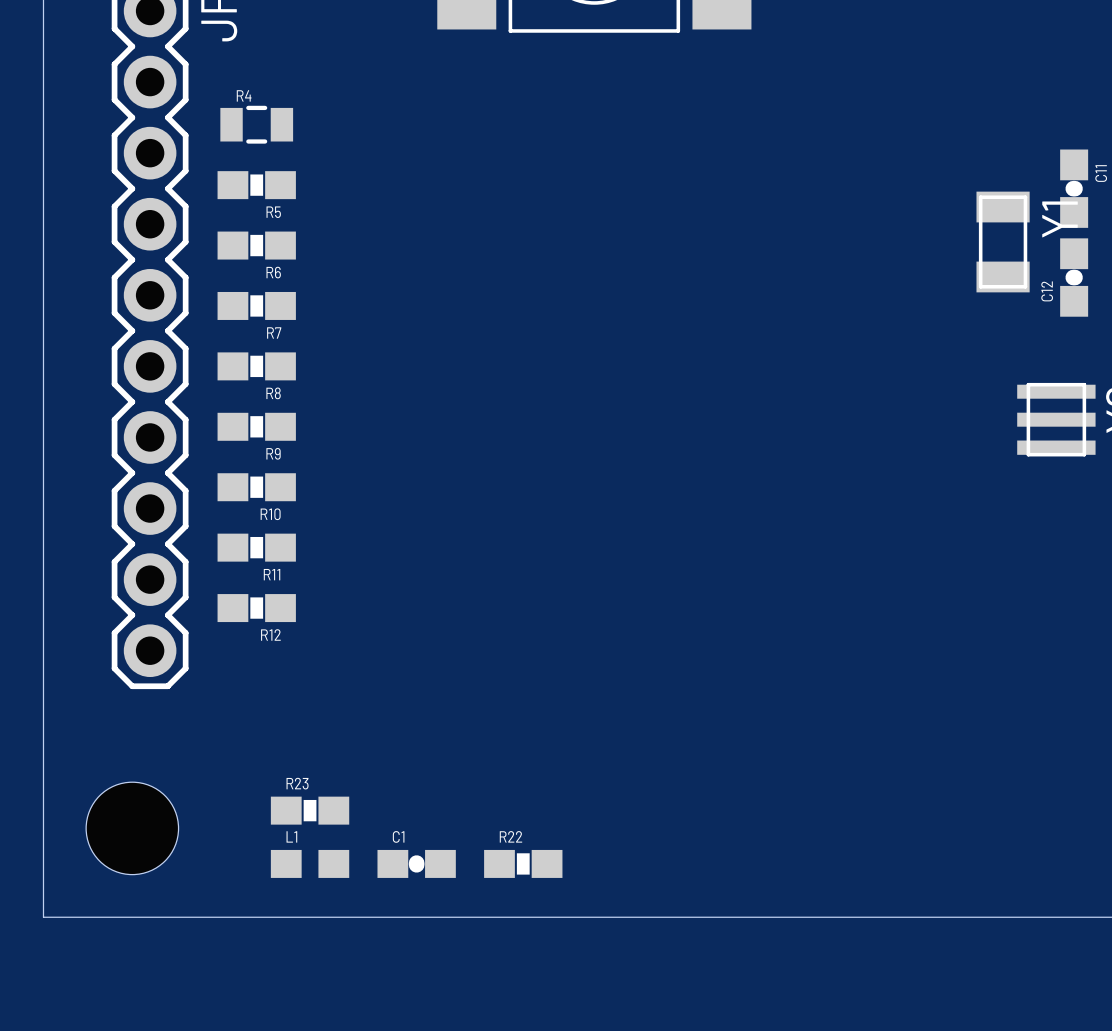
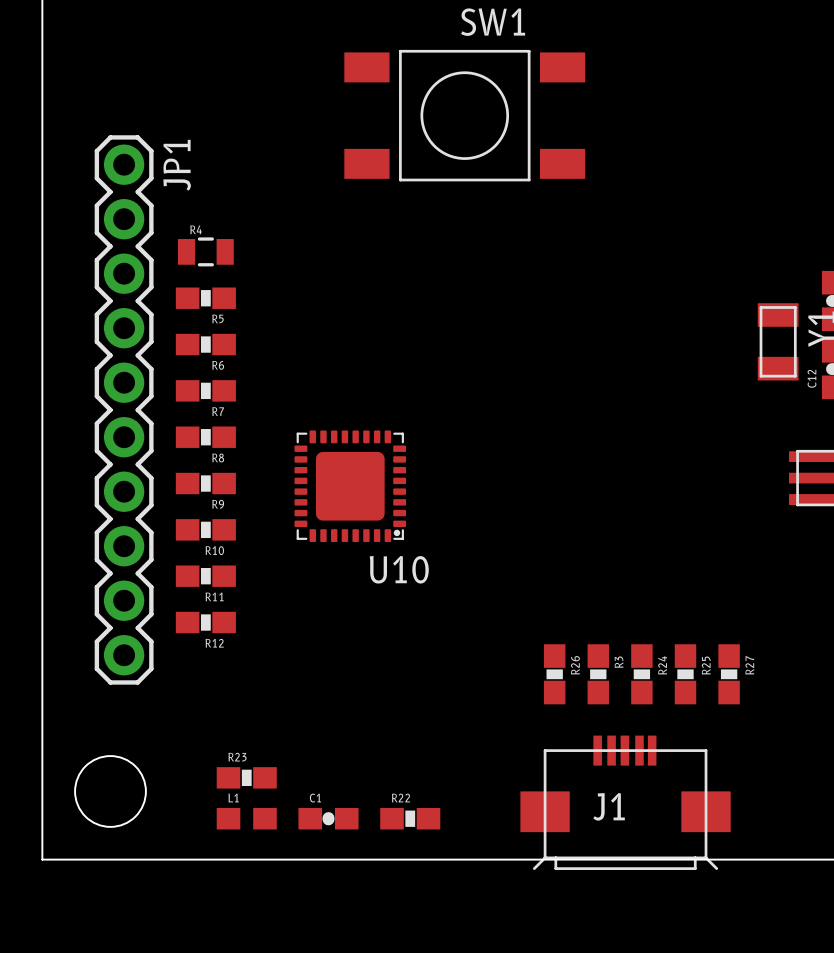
U10: none -> (350, 486)
R26: none -> (554, 674)
R3: none -> (598, 674)
R24: none -> (641, 674)
R25: none -> (685, 674)
R27: none -> (729, 674)
J1: none -> (625, 802)

